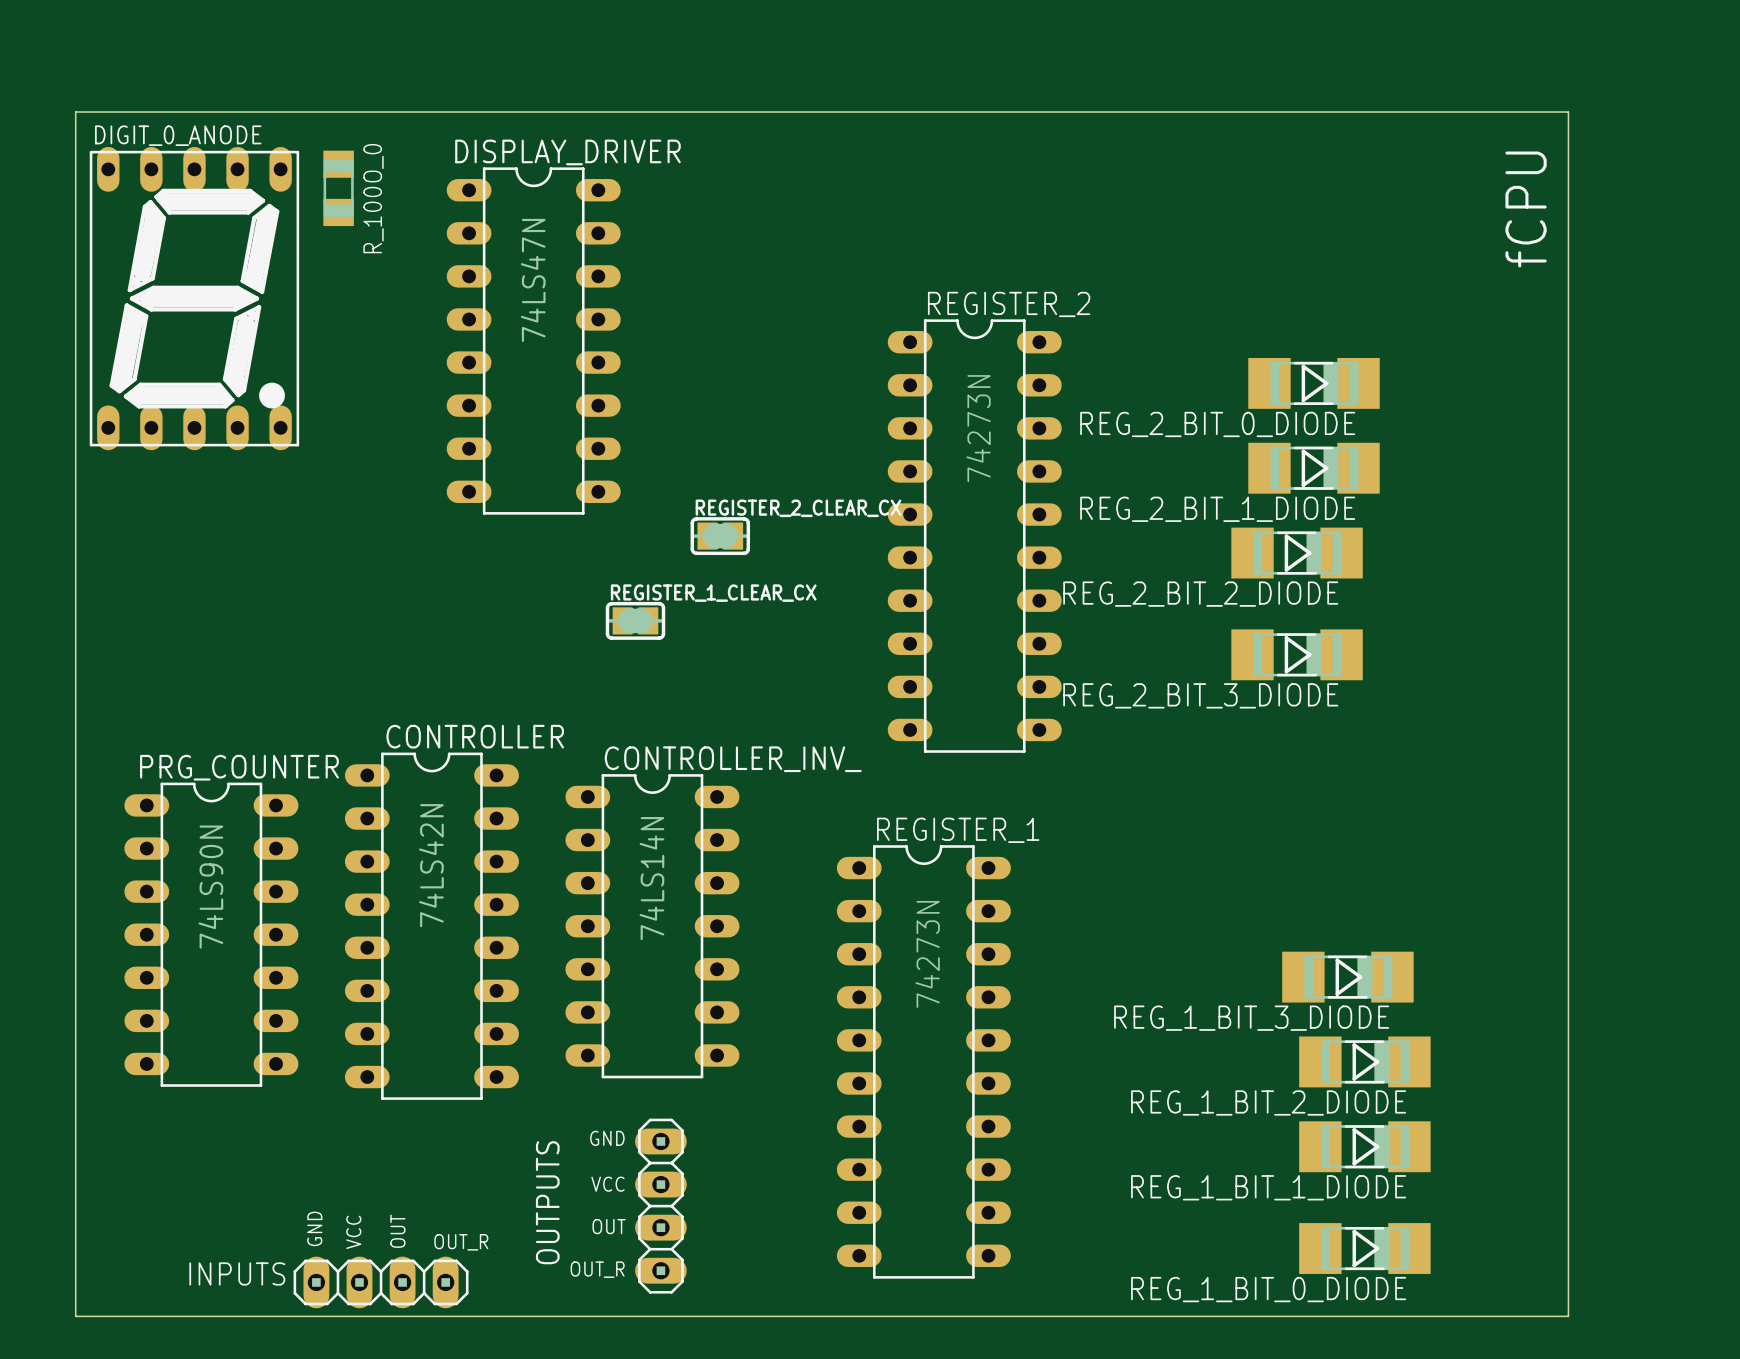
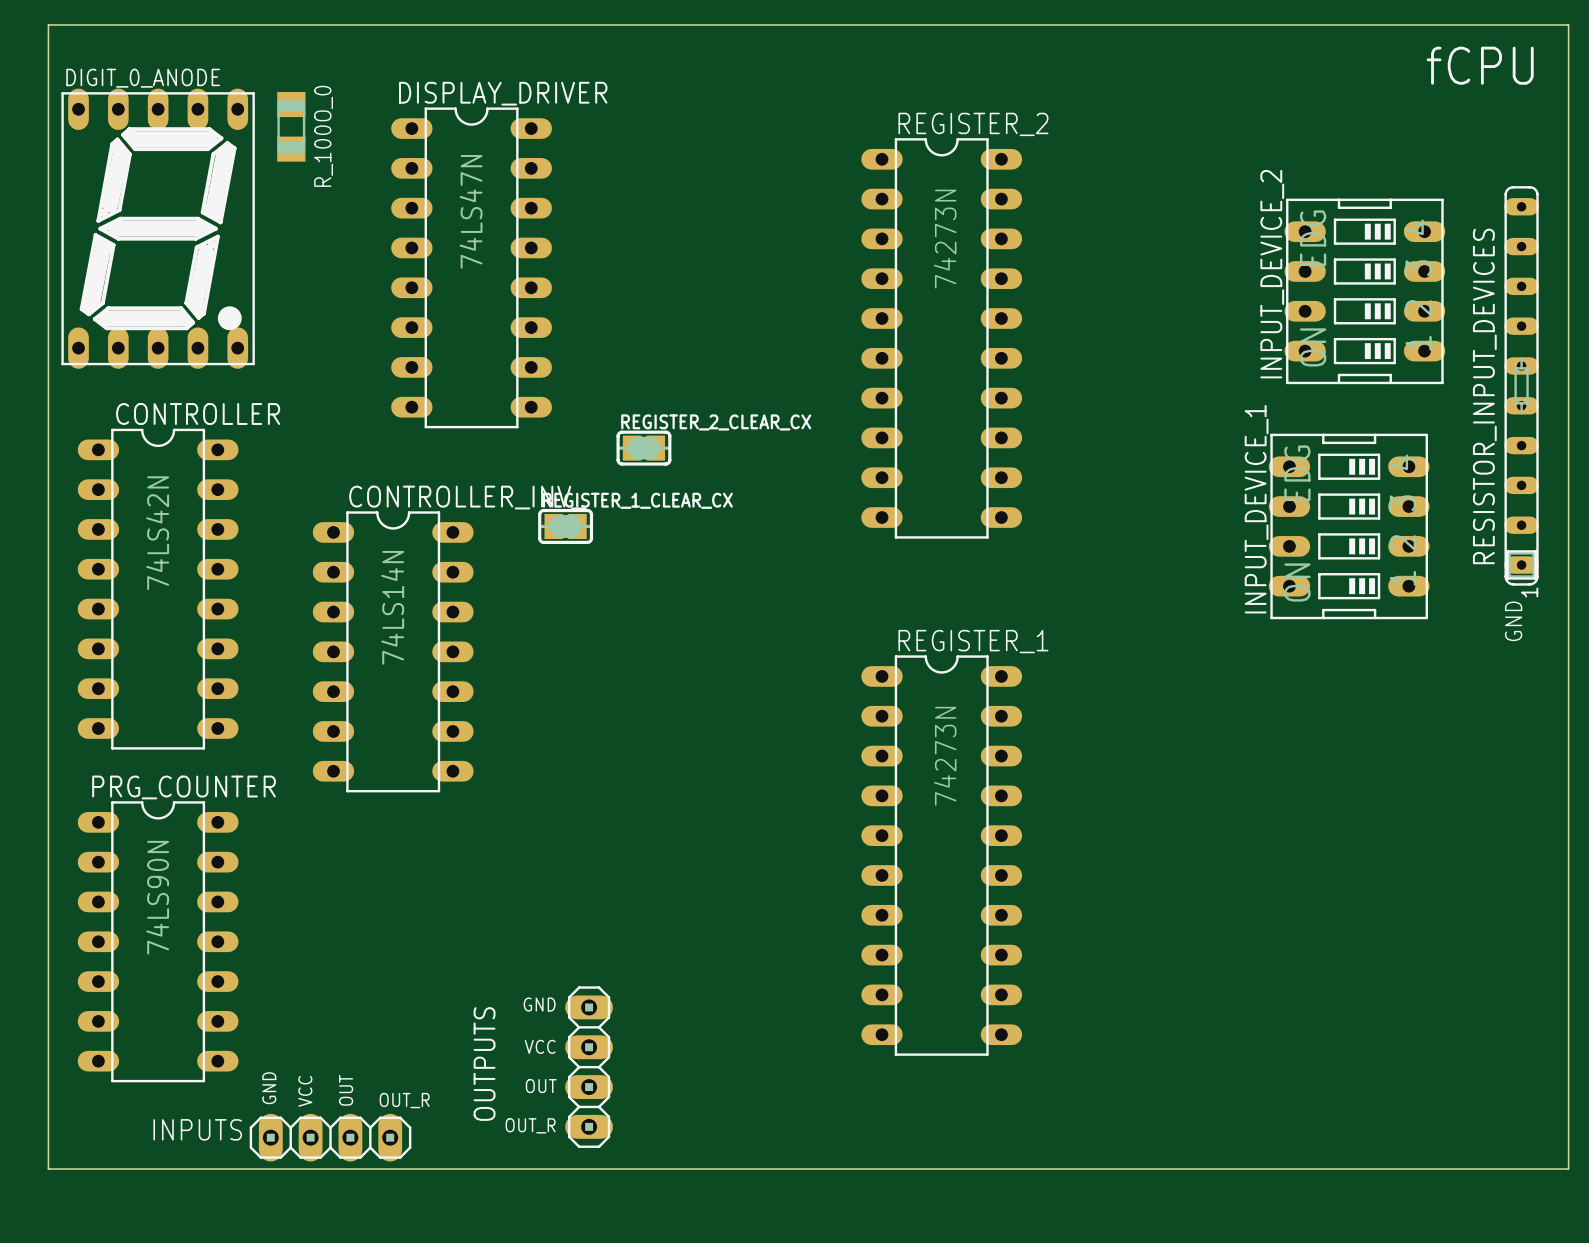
board edge: (75, 112) (1568, 112) (1568, 1316) -> (48, 56) (48, 24) (1568, 24) (1568, 1169) (1427, 1169)
text rotation: 0° (1526, 209) -> 90° clockwise (1480, 65)
INPUT_DEVICE_2: none -> (1364, 291)
REG_2_BIT_0_DIODE: (1314, 383) -> none
REG_2_BIT_1_DIODE: (1314, 468) -> none
RESISTOR_INPUT_DEVICES: none -> (1521, 385)
REGISTER_2 position: (974, 536) -> (941, 338)
REG_2_BIT_2_DIODE: (1297, 553) -> none
INPUT_DEVICE_1: none -> (1349, 526)
REG_2_BIT_3_DIODE: (1297, 654) -> none
text: none -> GND (1513, 621)
CONTROLLER position: (431, 926) -> (158, 589)
CONTROLLER_INV_ position: (652, 926) -> (393, 651)
PRG_COUNTER position: (211, 934) -> (158, 941)
REG_1_BIT_3_DIODE: (1347, 977) -> none
REGISTER_1 position: (923, 1061) -> (941, 855)
REG_1_BIT_2_DIODE: (1364, 1061) -> none
REG_1_BIT_1_DIODE: (1364, 1146) -> none
REG_1_BIT_0_DIODE: (1364, 1248) -> none

